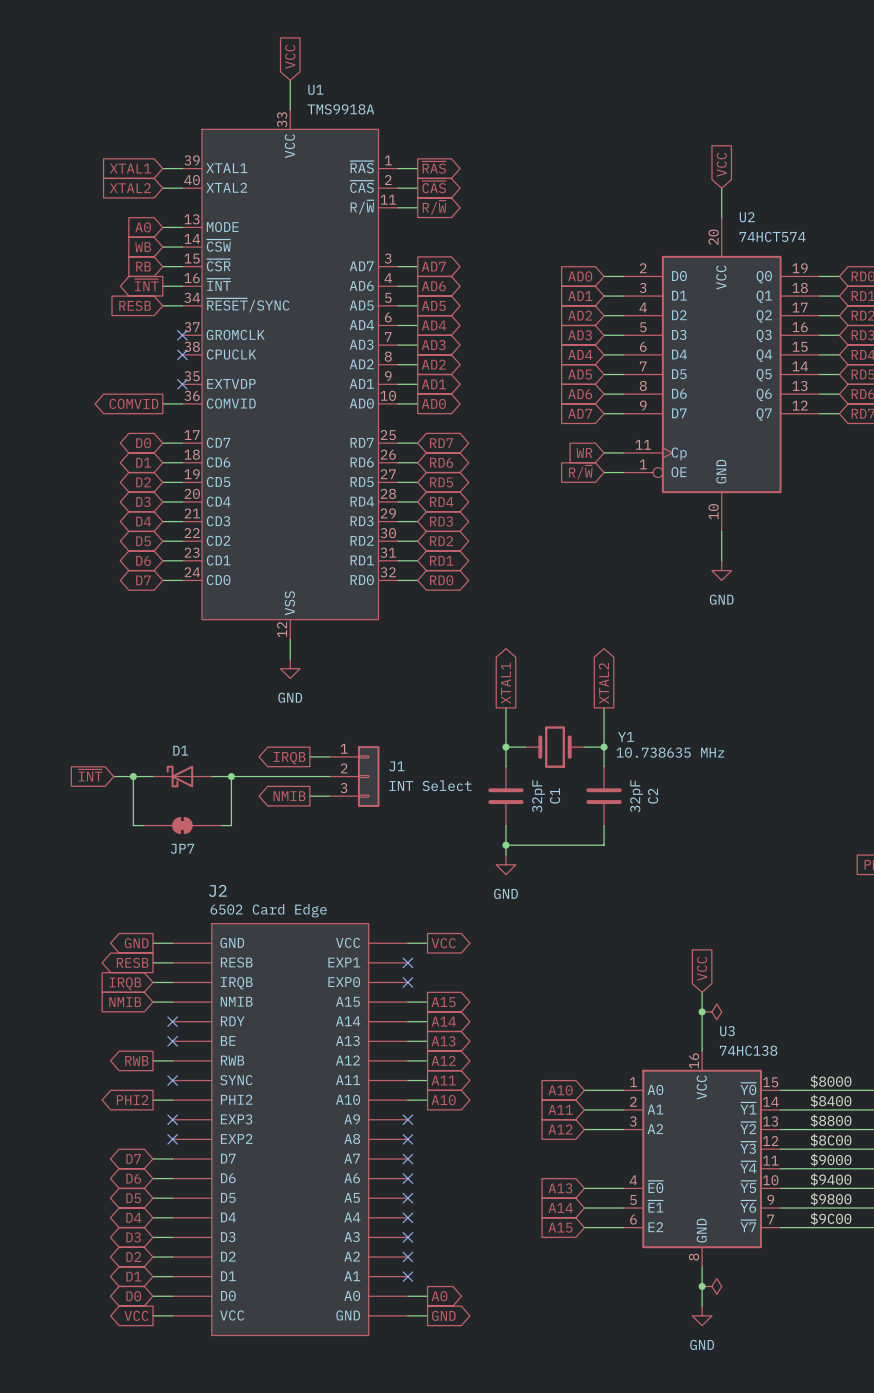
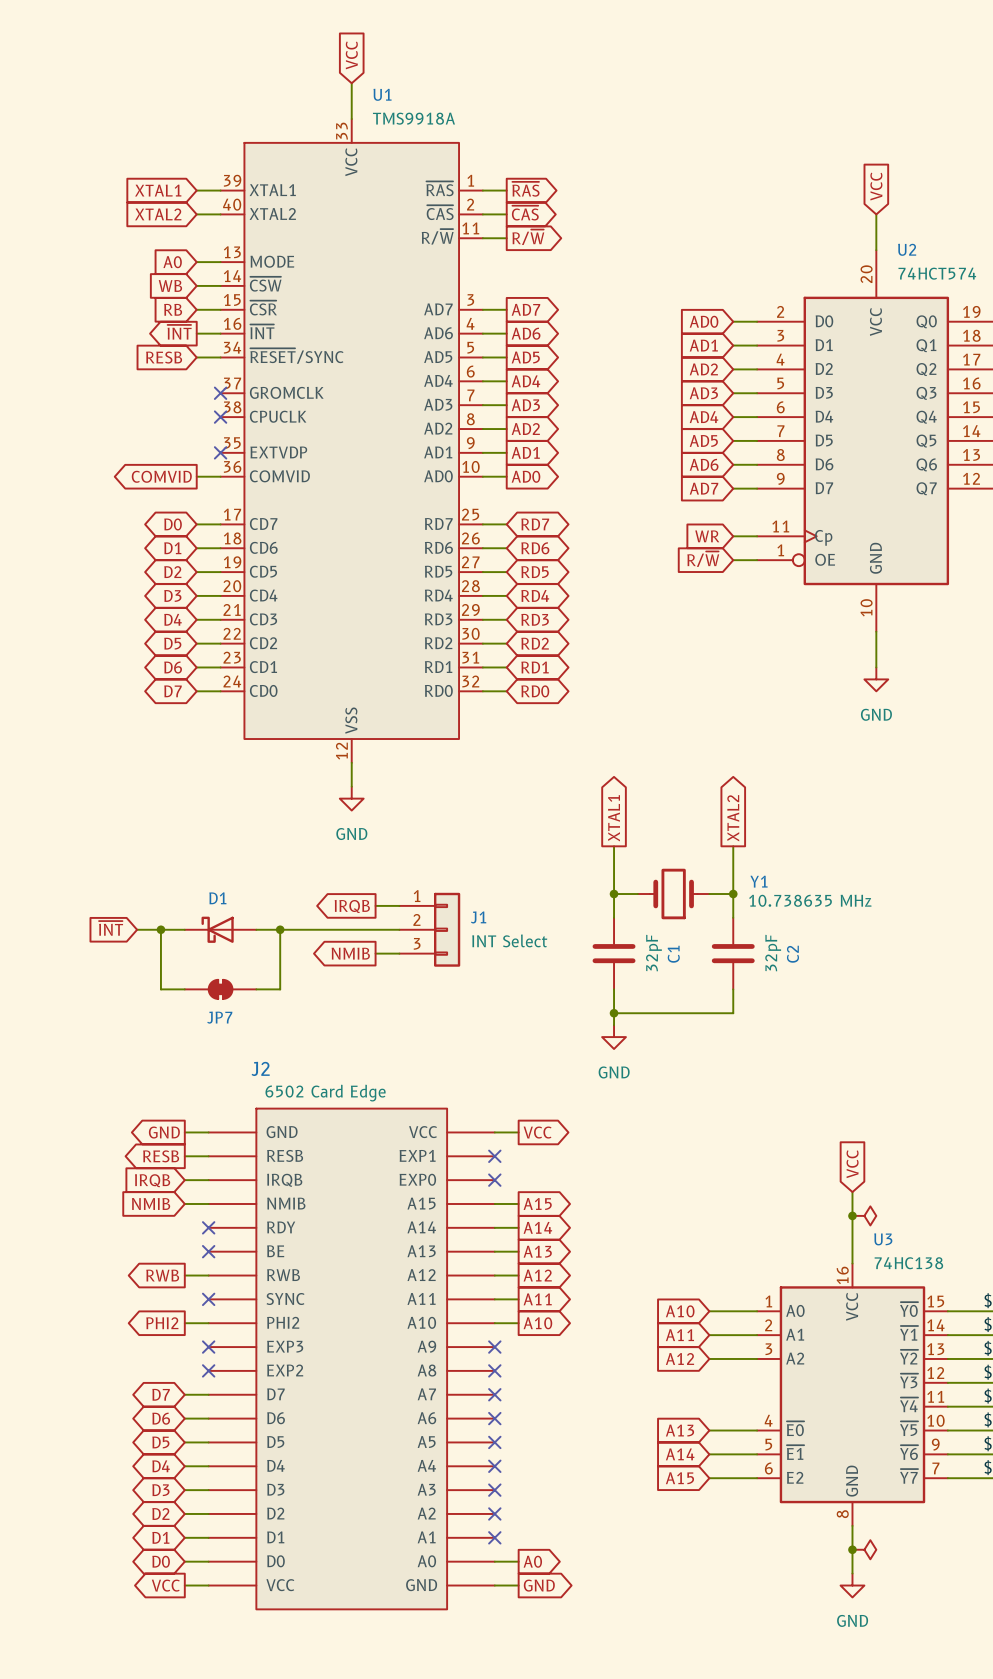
JP7 symbol: [143, 817, 222, 835] -> [184, 979, 257, 999]

